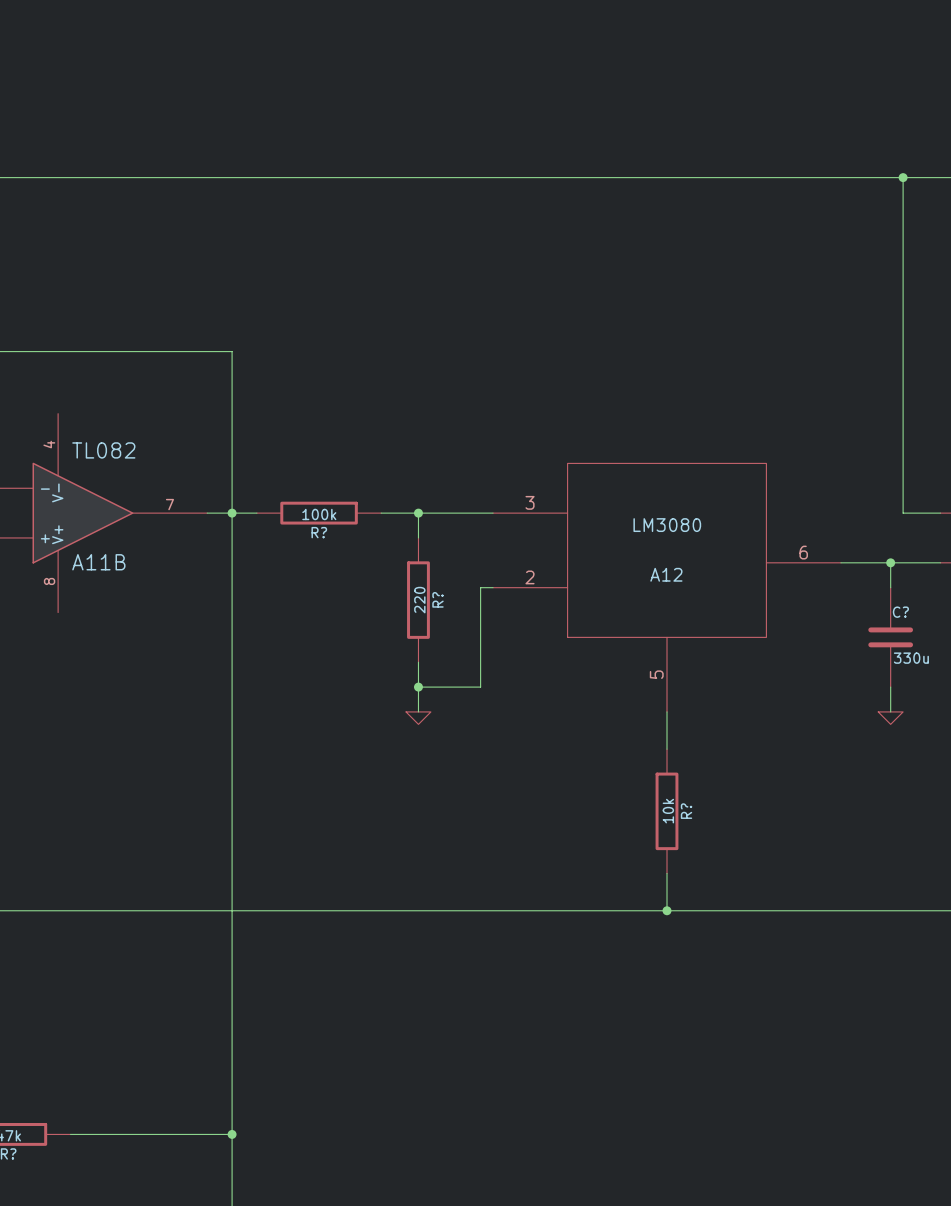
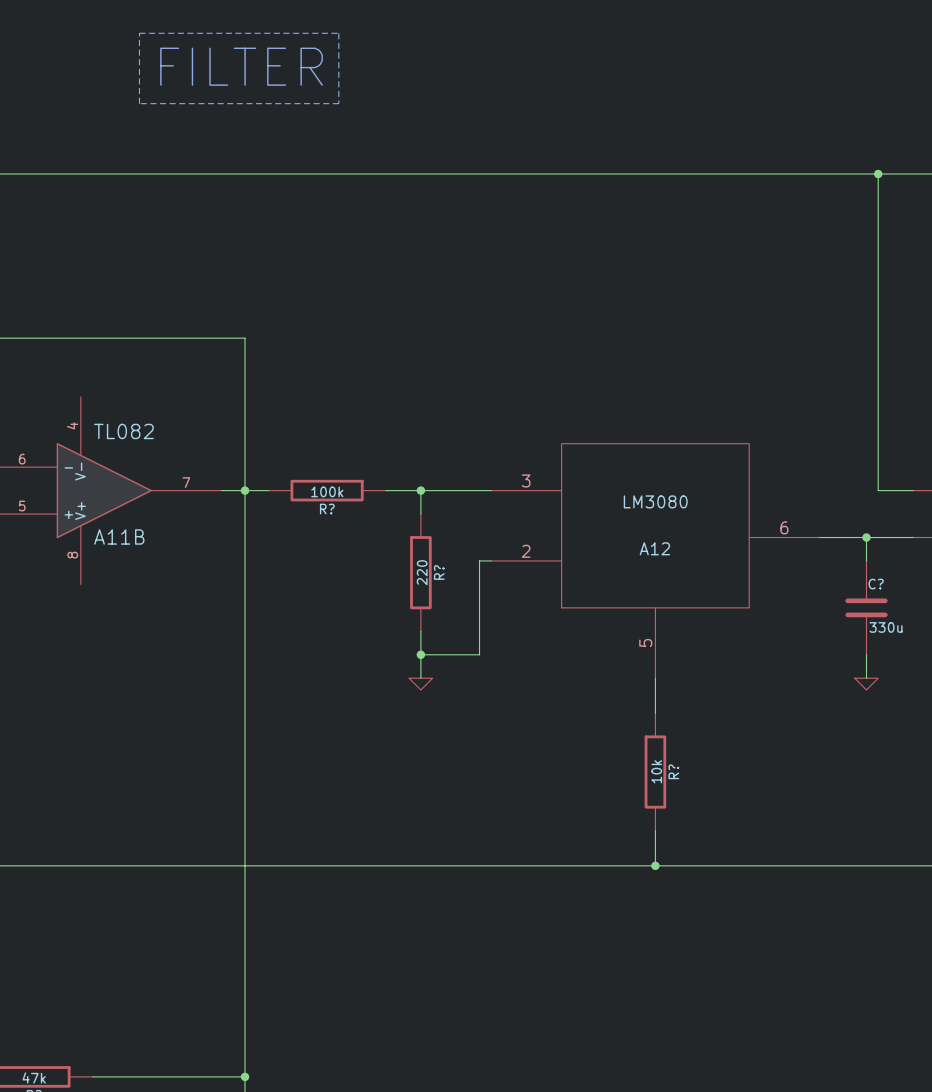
line: none -> (139, 33) (338, 33) (338, 103) (139, 103) (139, 33)
text: none -> FILTER (241, 66)

